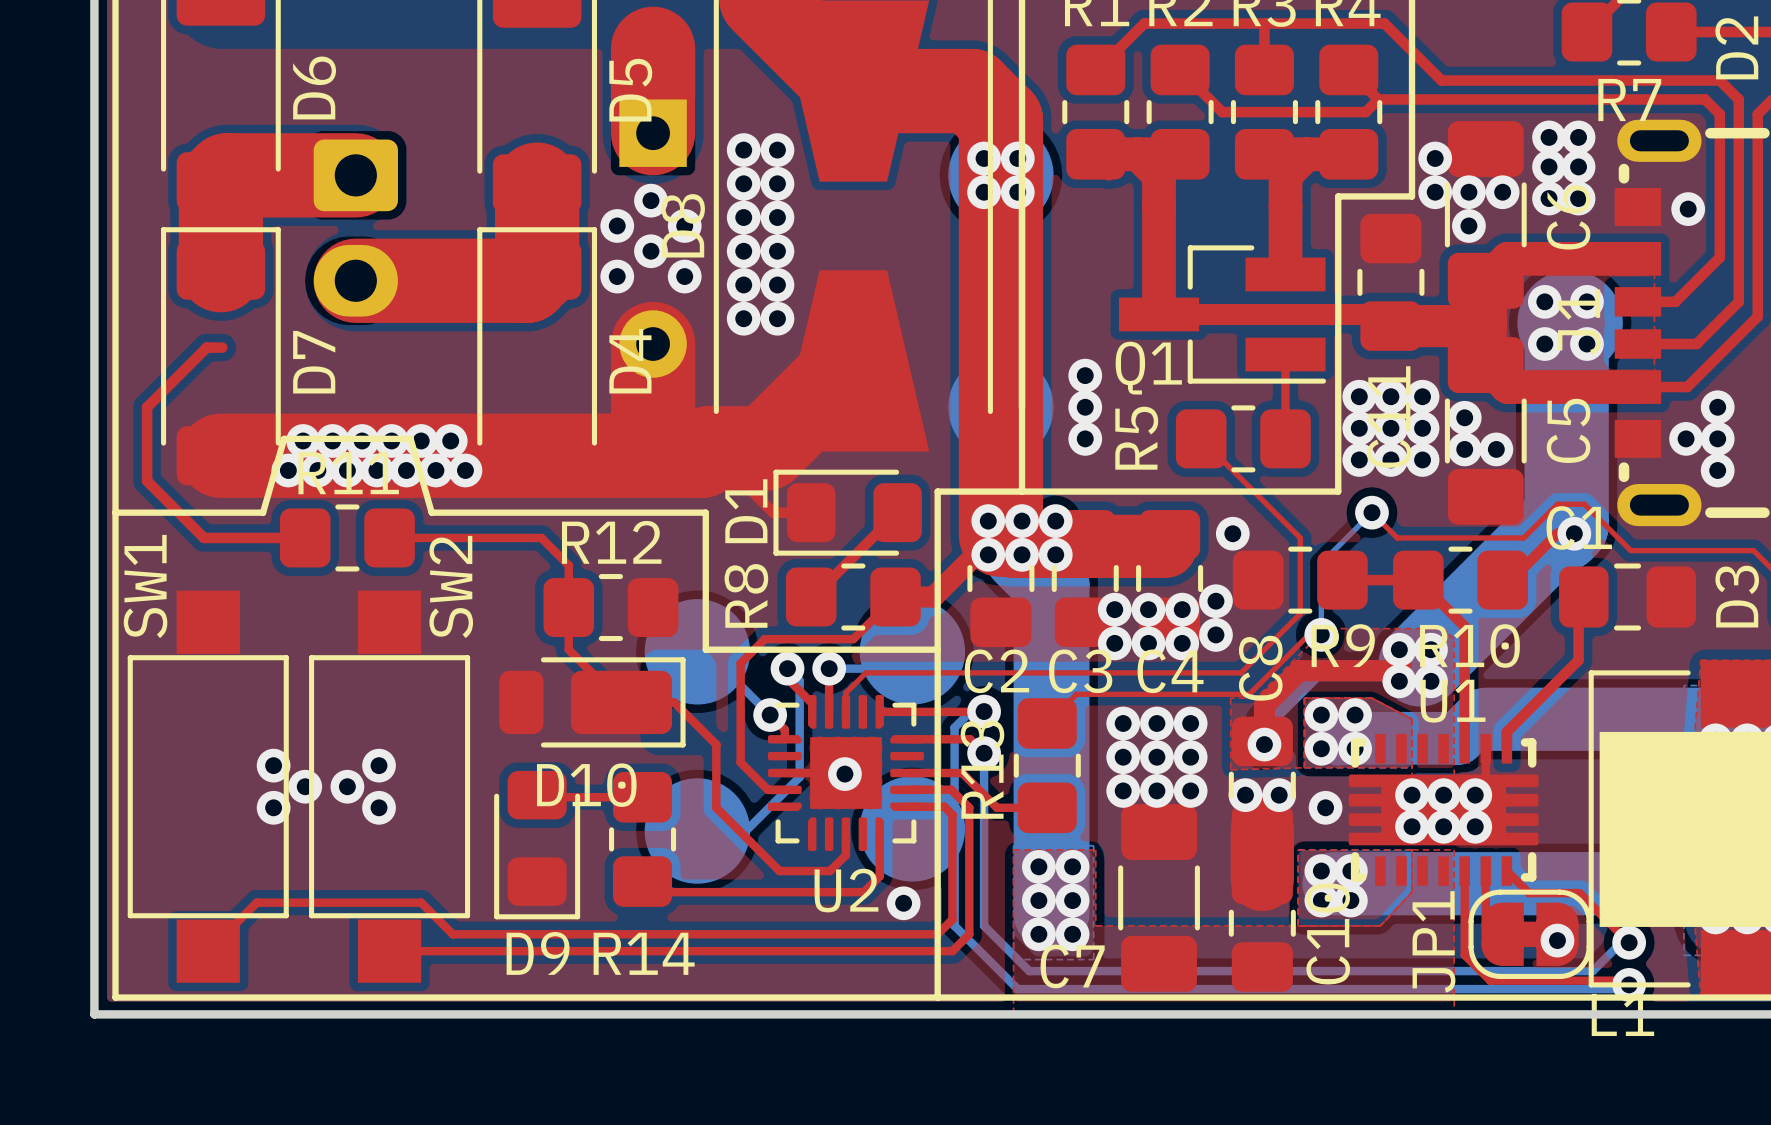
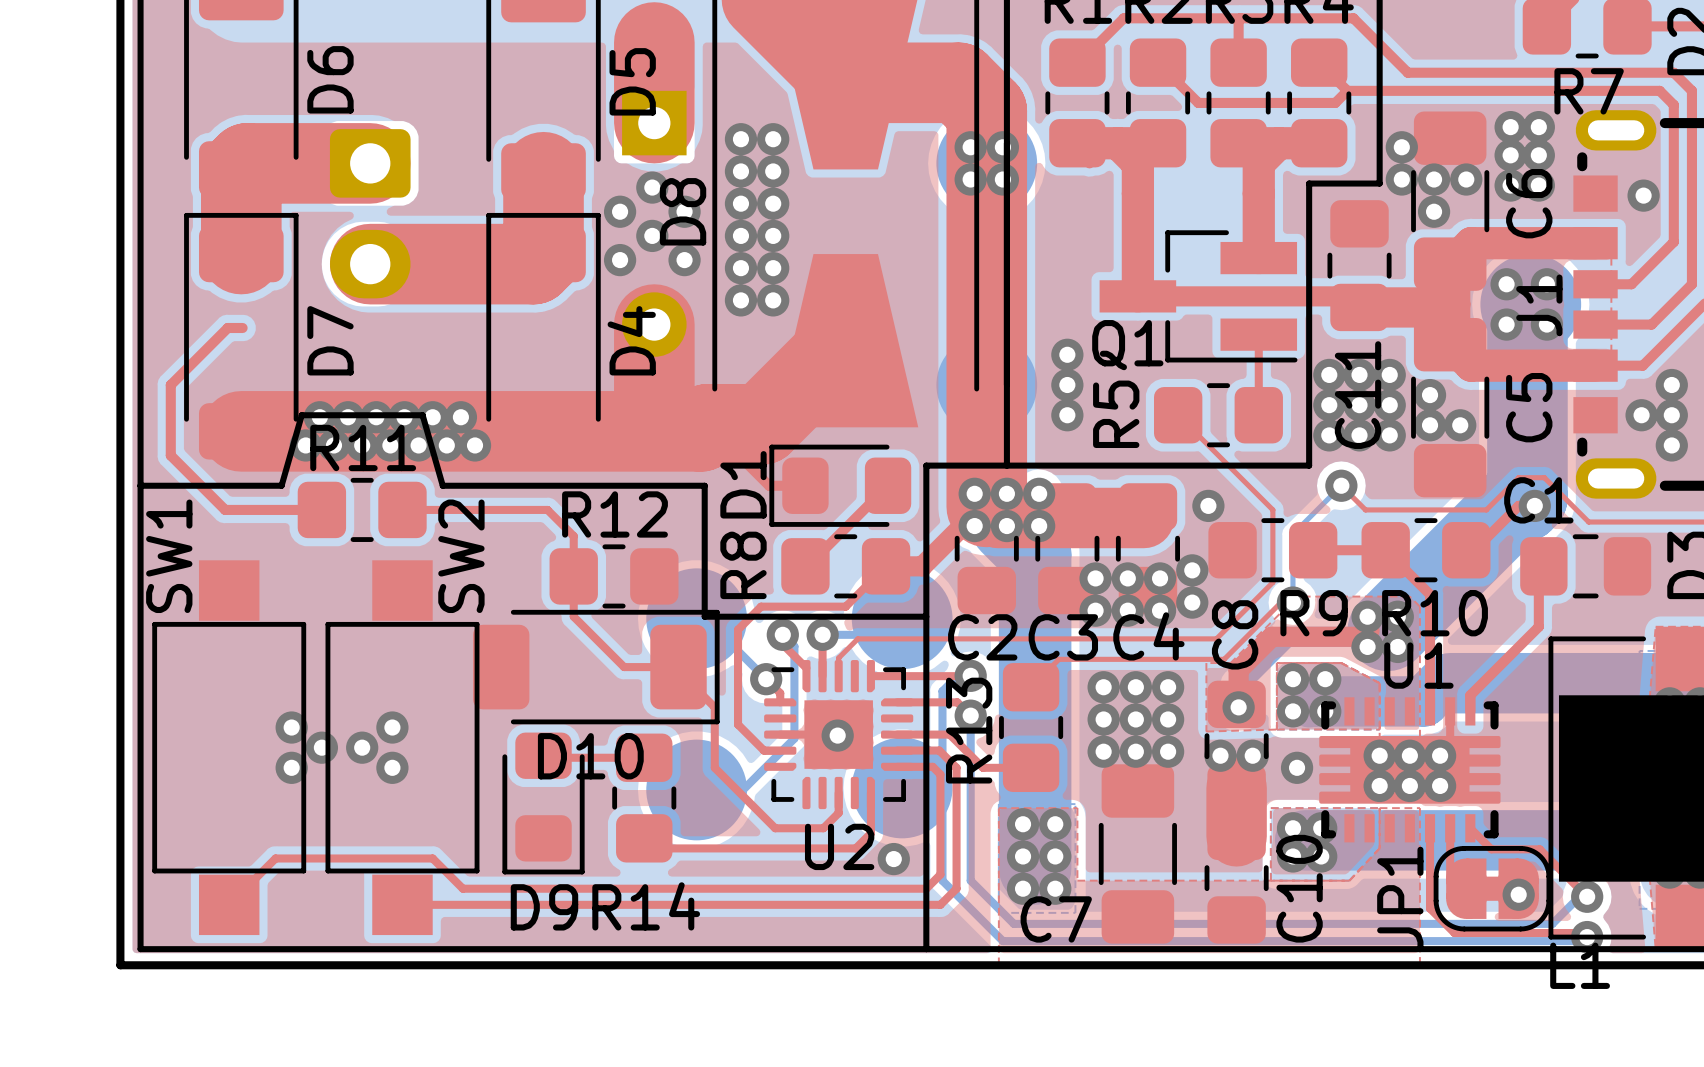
D10 footprint: [499, 657, 686, 748] -> [473, 609, 720, 725]

